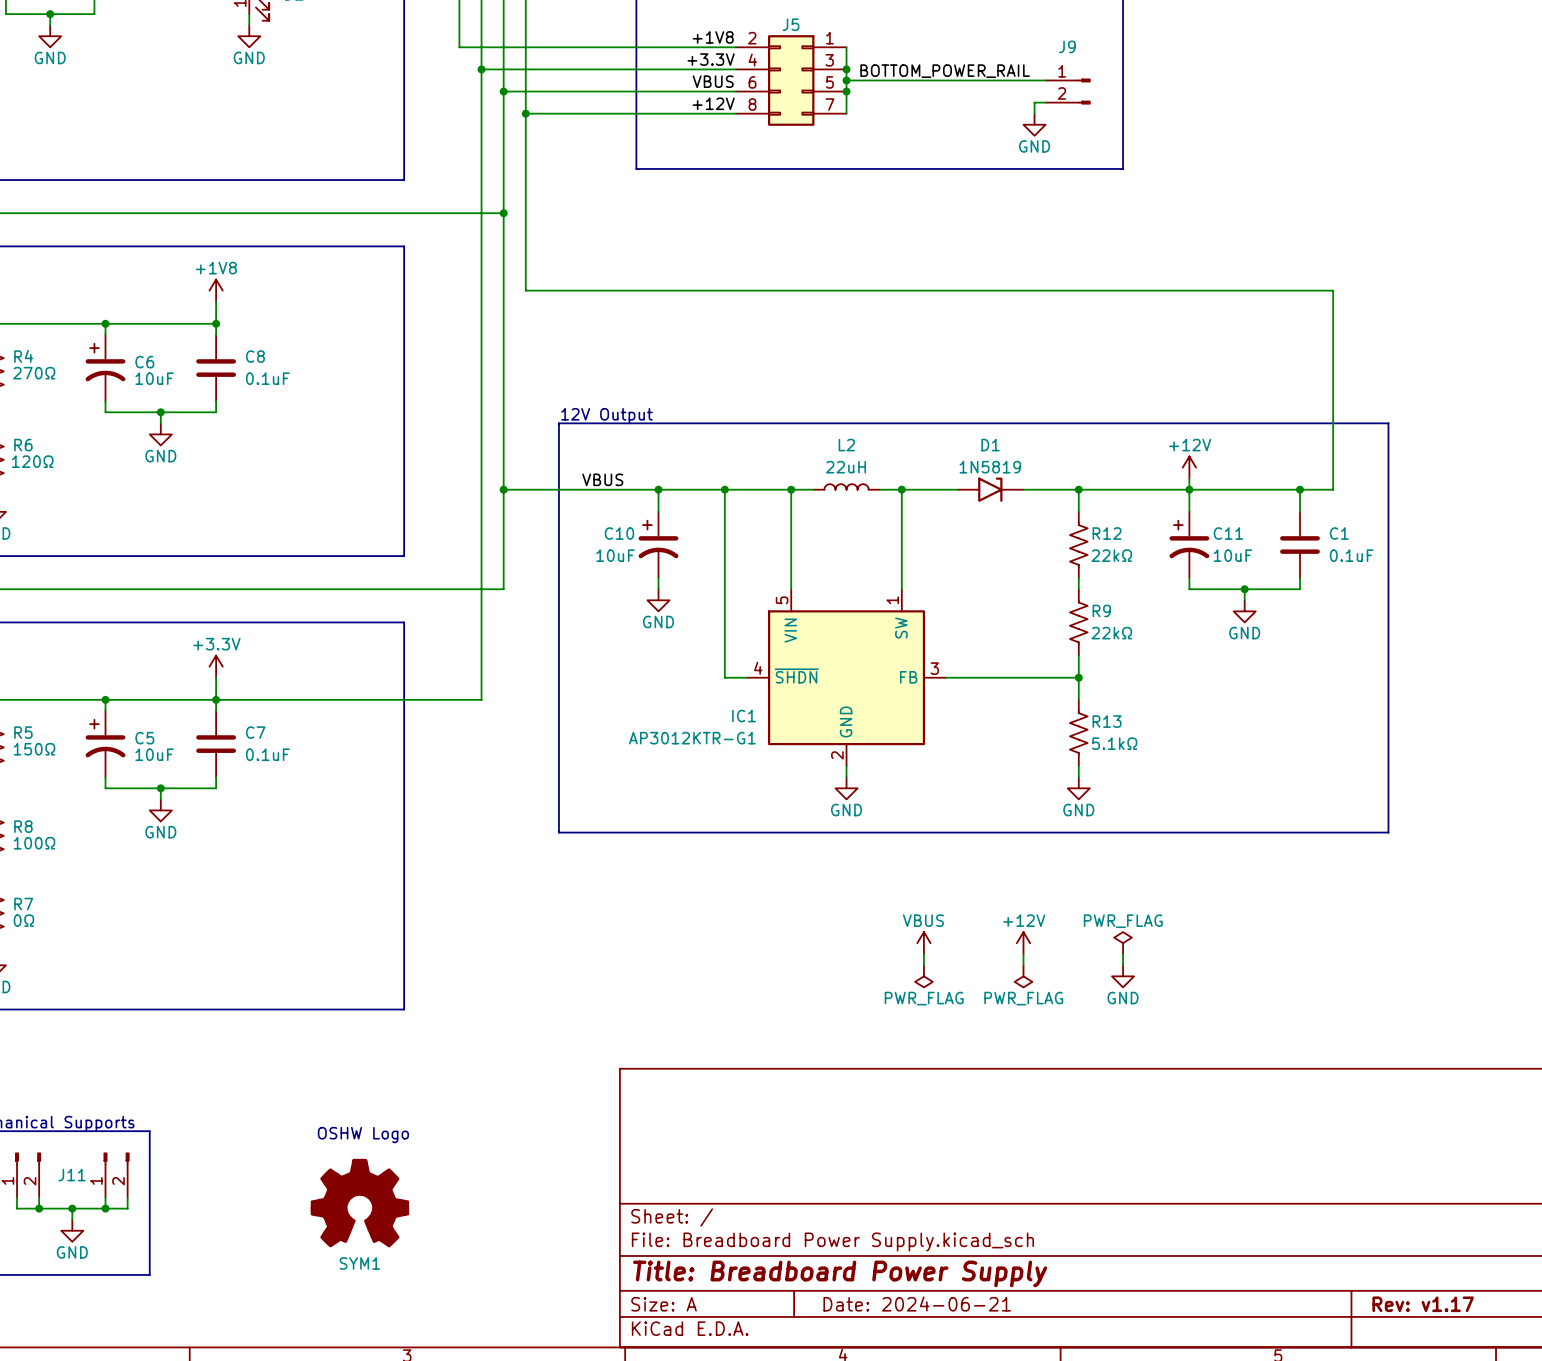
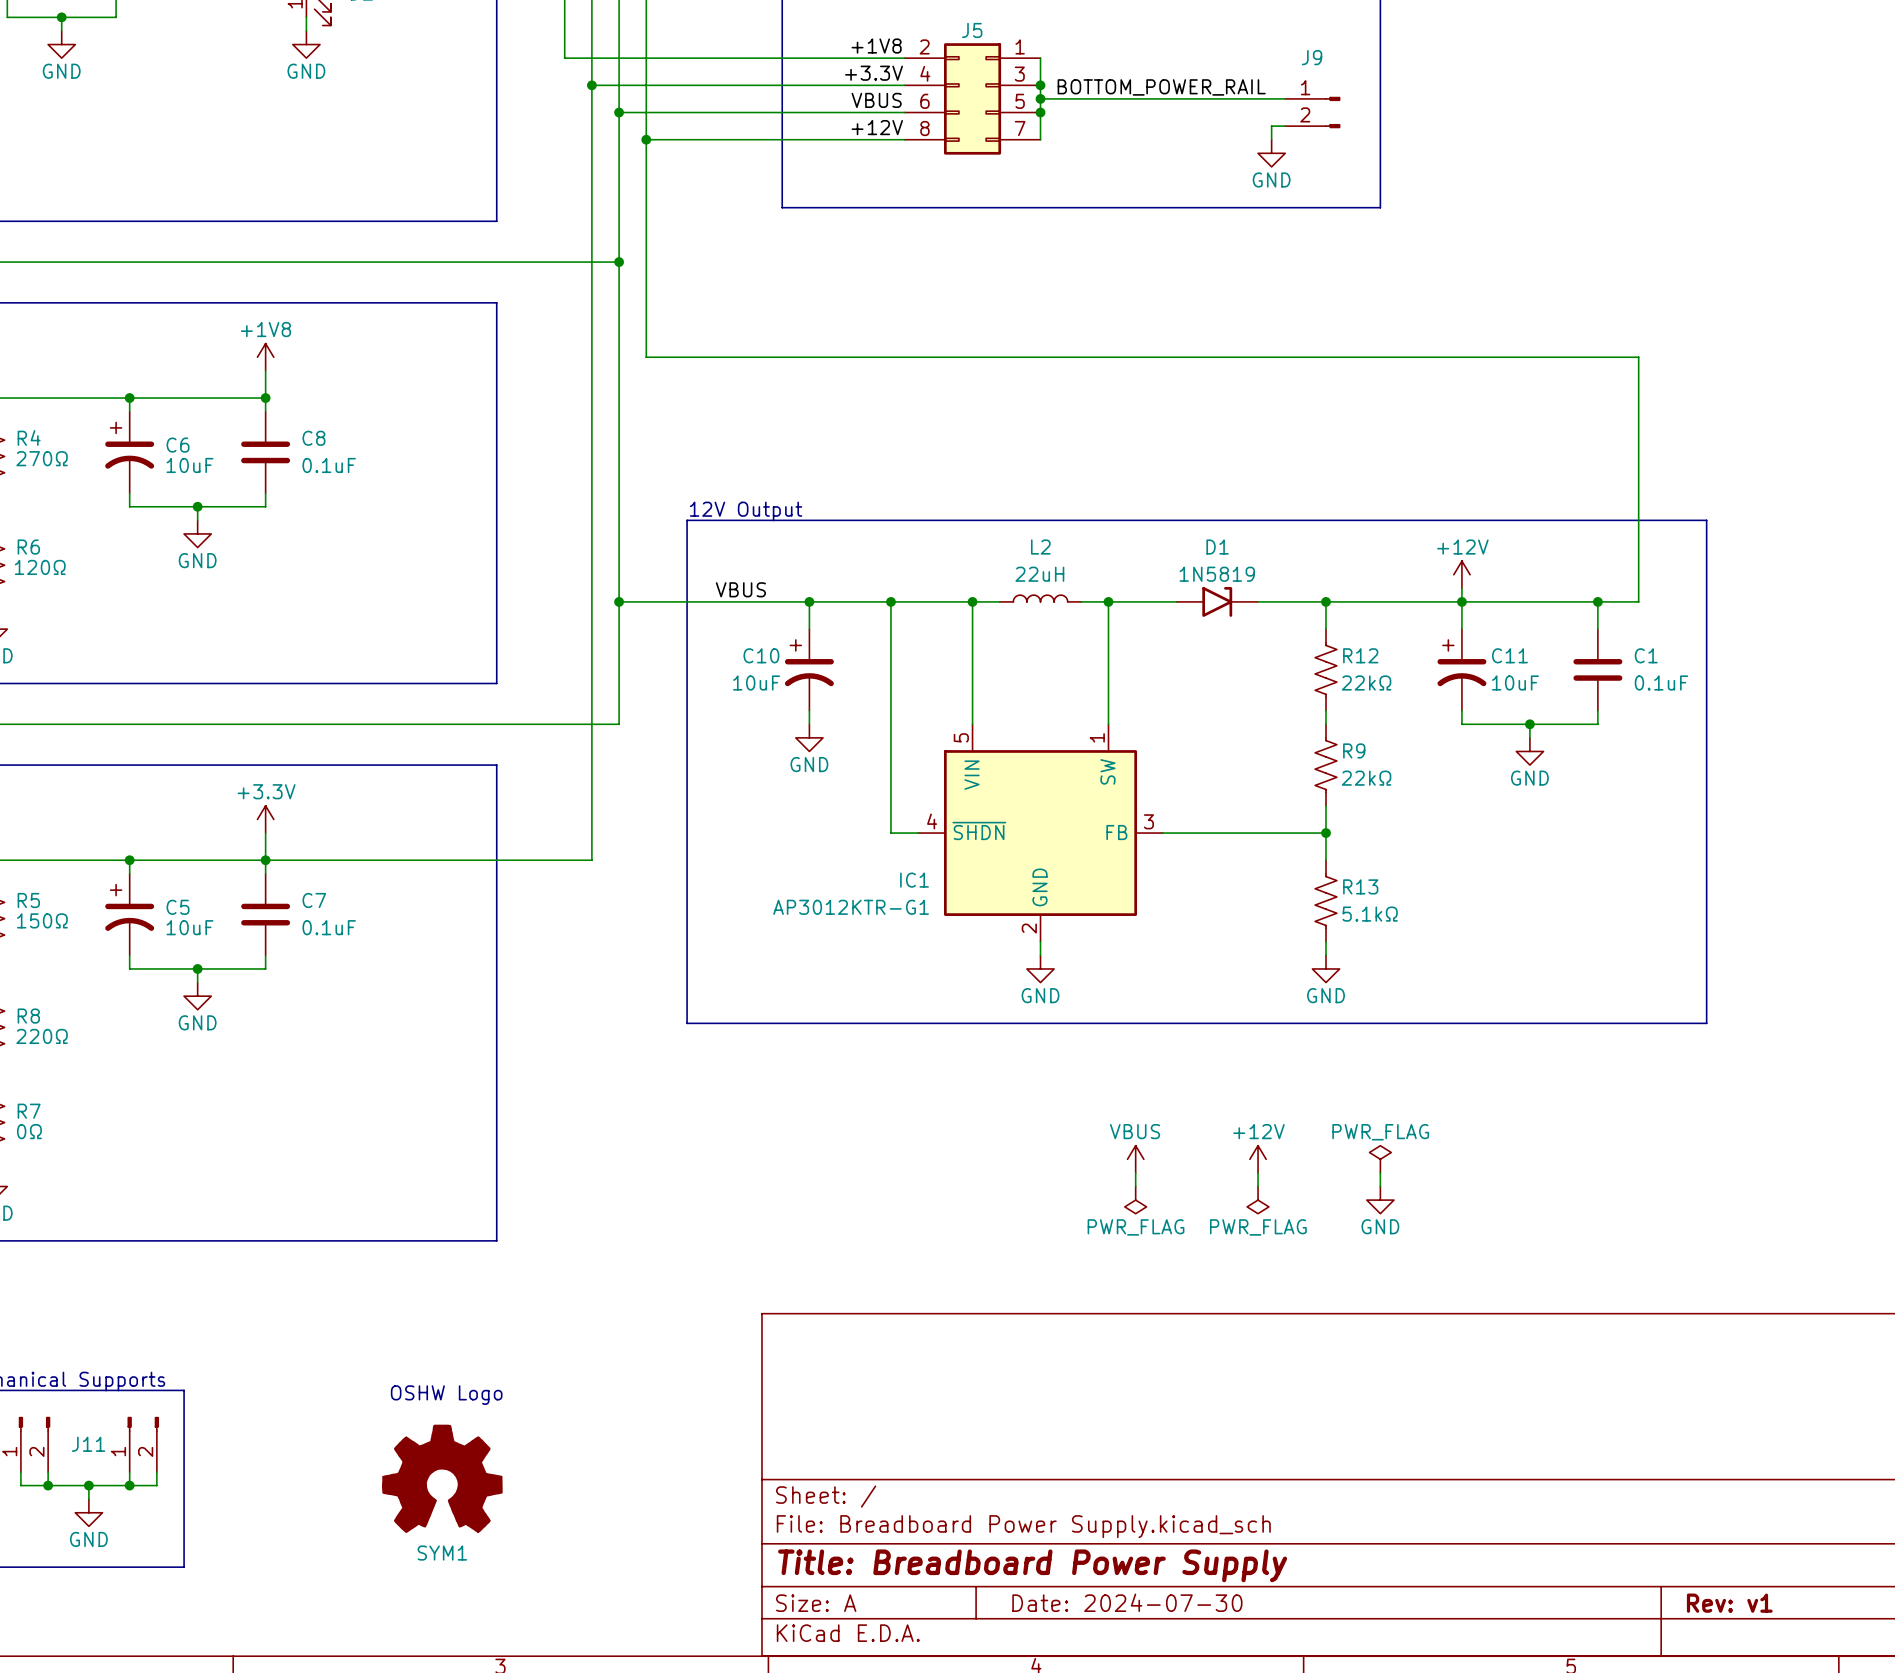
R8 value: 100Ω (34, 843) -> 220Ω (42, 1036)
title block: Date: 2024-06-21 (917, 1303) -> Date: 2024-07-30 (1127, 1602)
title block: Rev: v1.17 (1423, 1304) -> Rev: v1 (1729, 1603)

